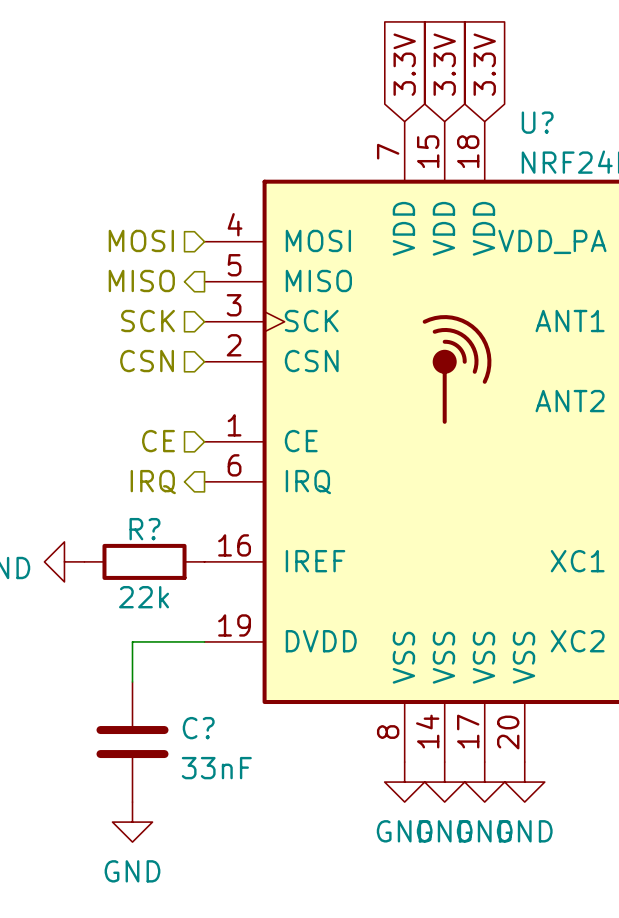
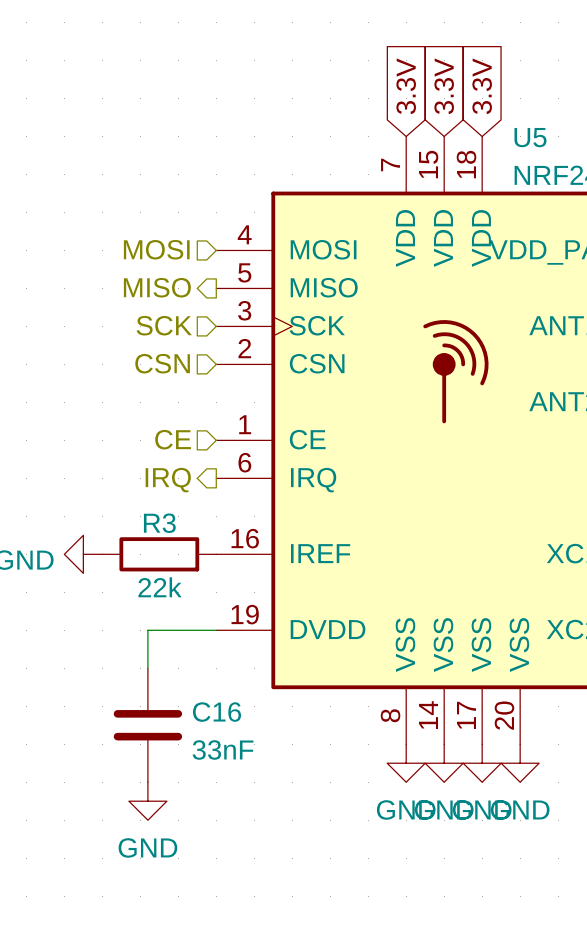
U? name: U? (537, 122) -> U5 (530, 137)
R? name: R? (144, 529) -> R3 (159, 523)
C? name: C? (198, 728) -> C16 (217, 712)

